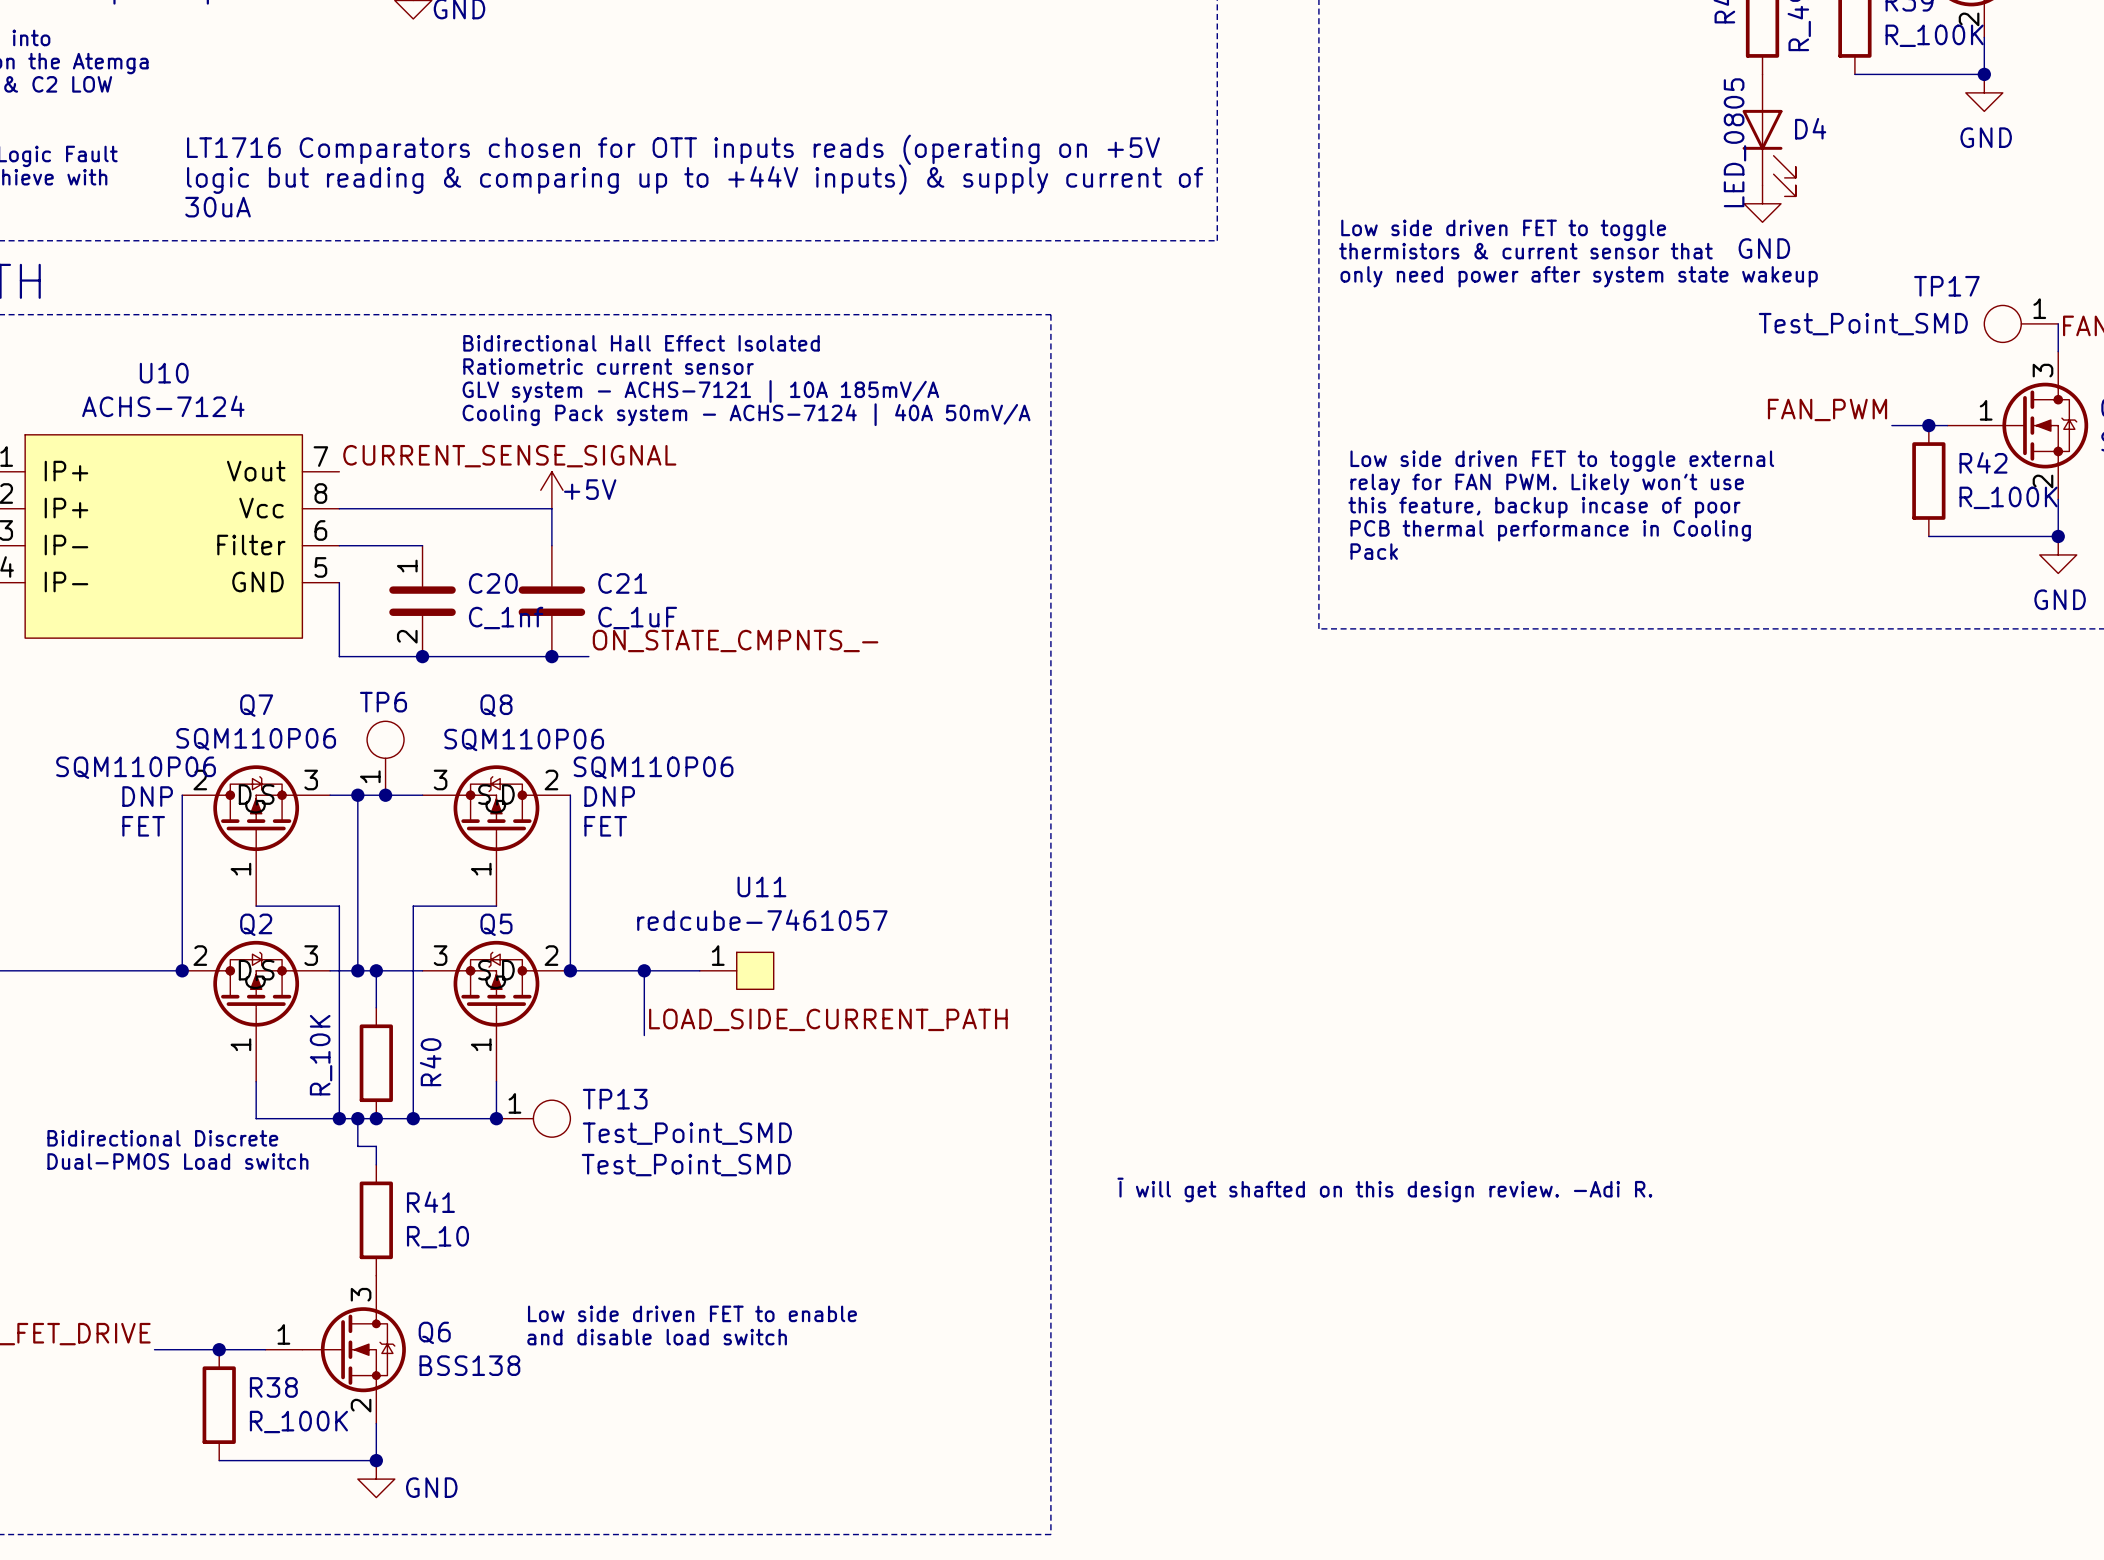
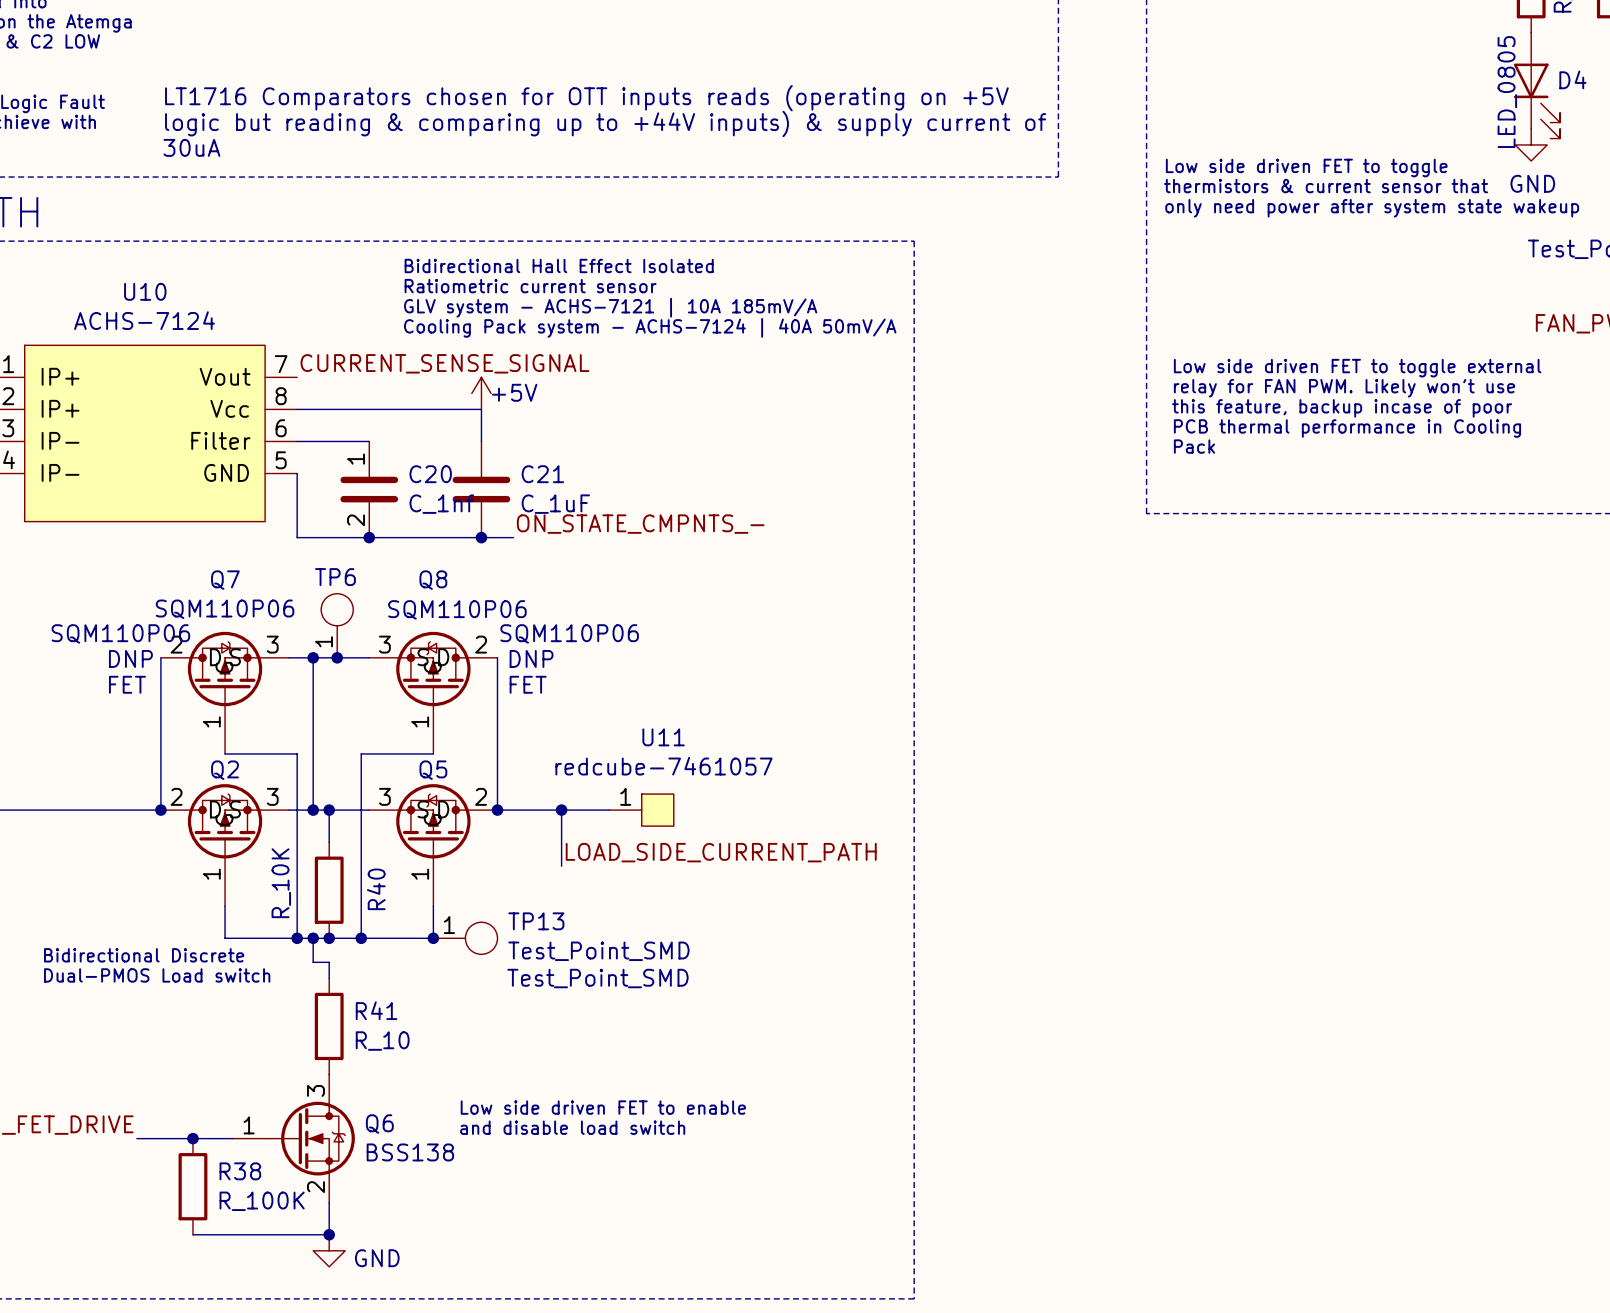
text: ~{I} will get shafted on this design review. -Adi R. (1384, 1189) -> none

